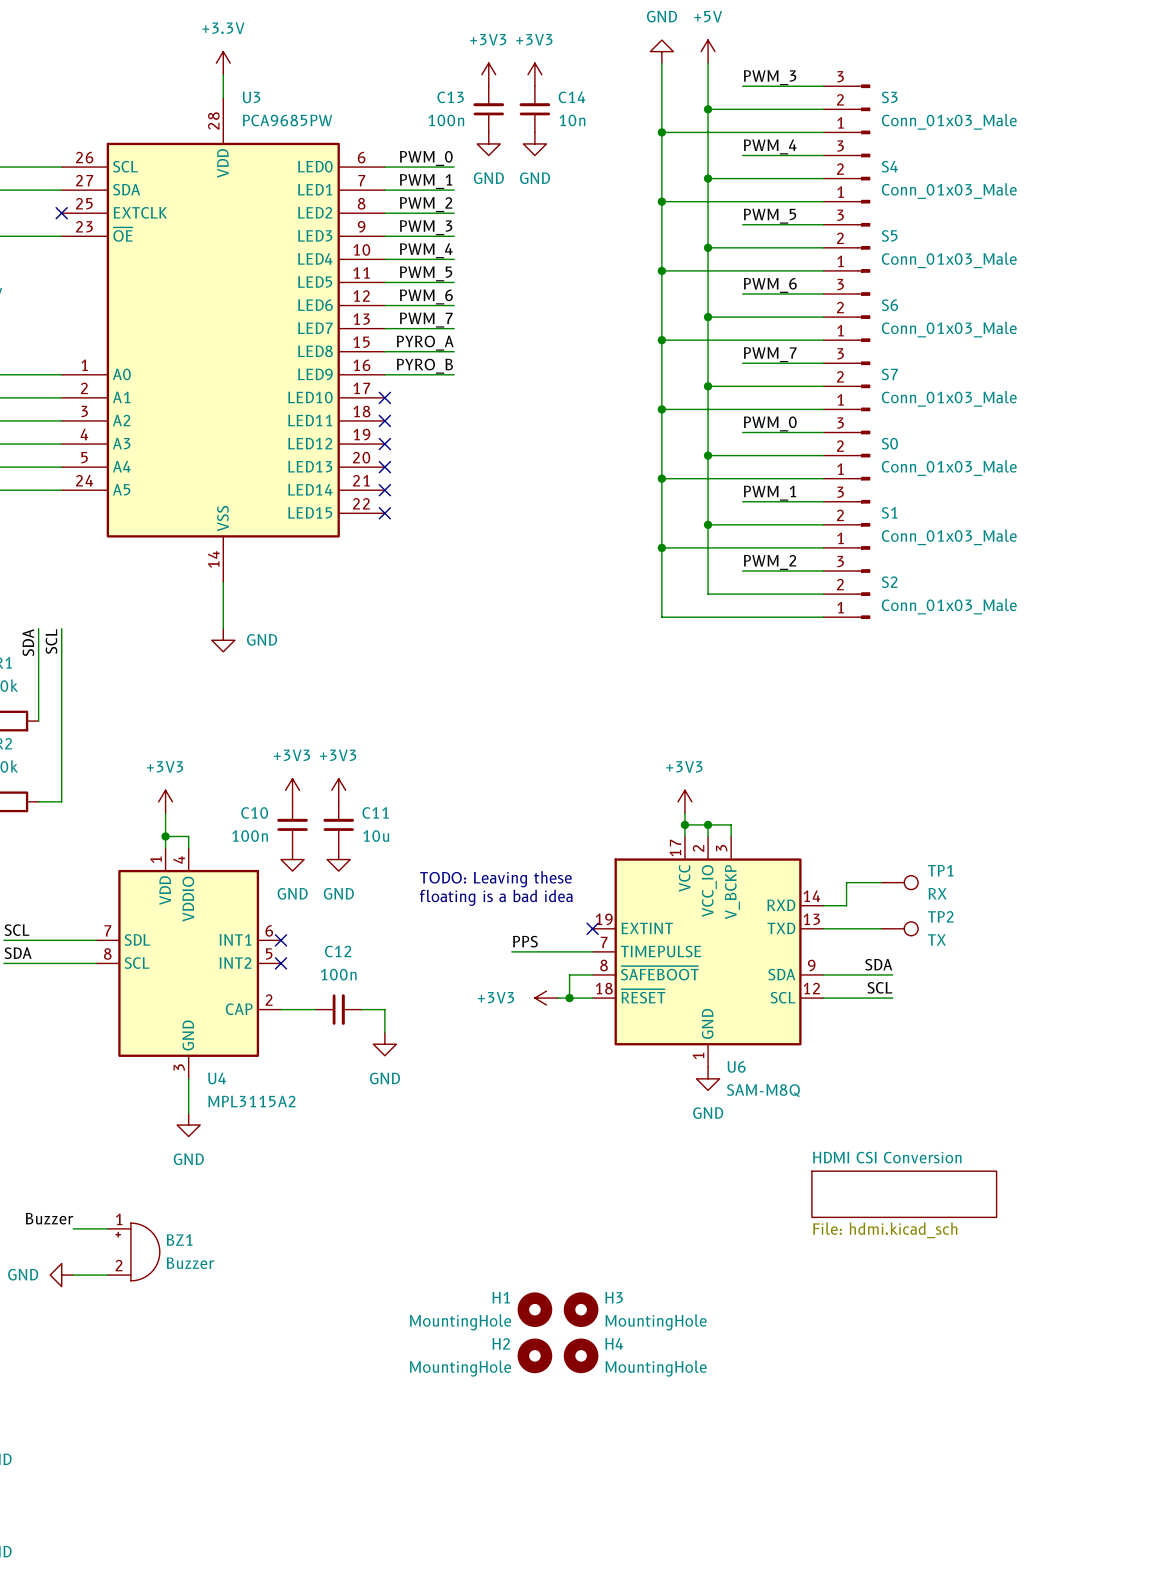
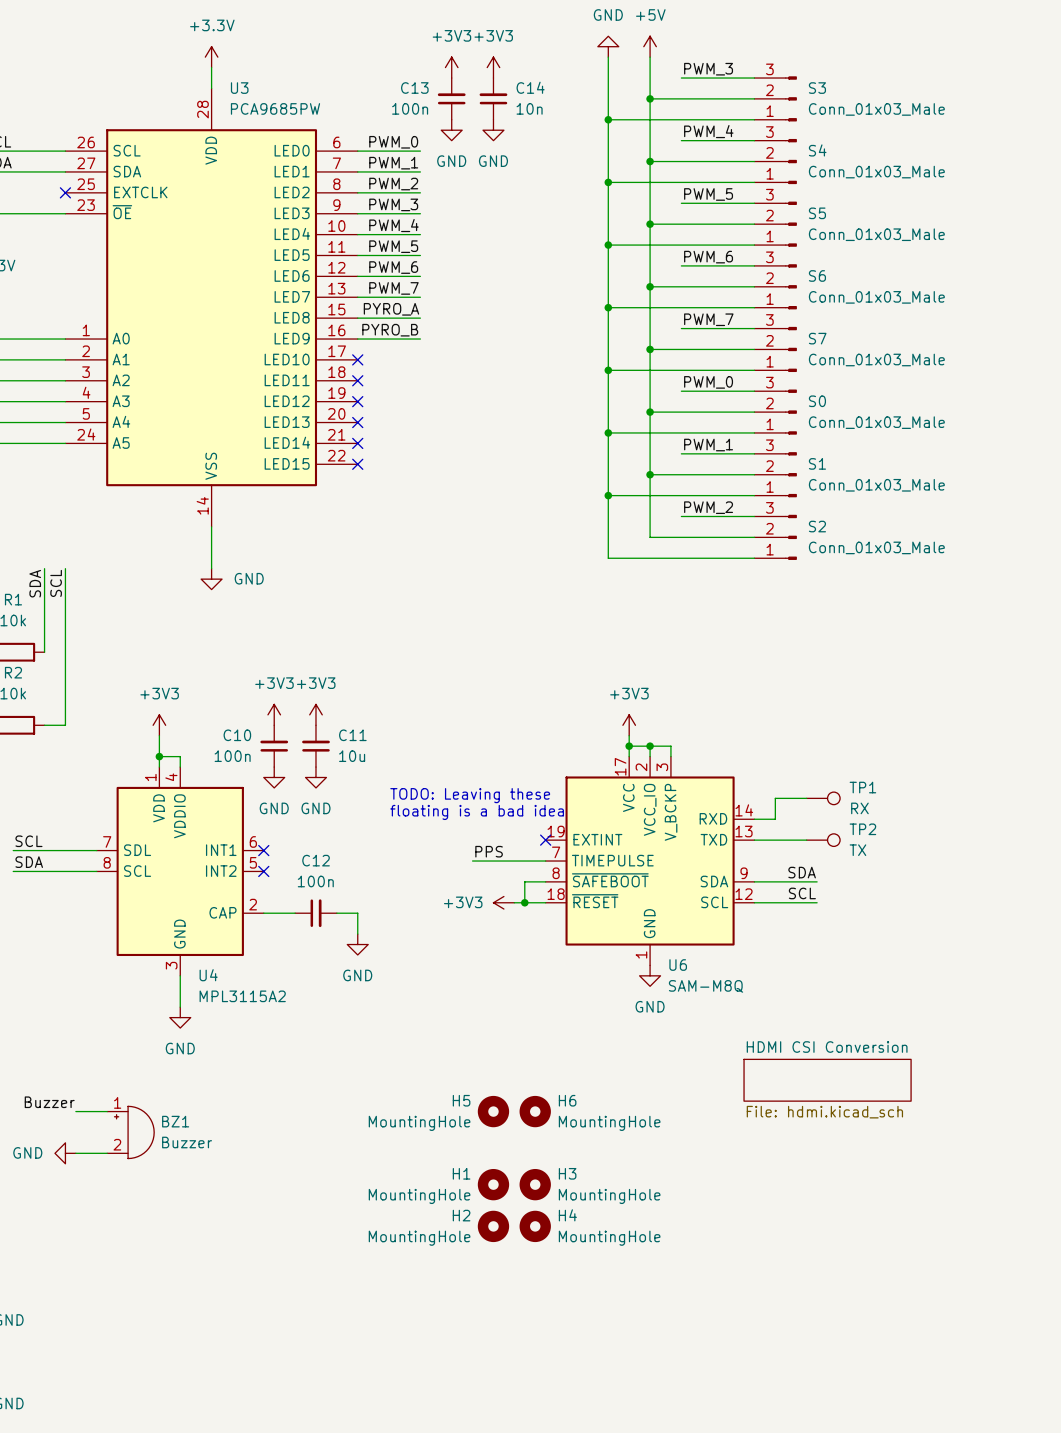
H5: none -> MountingHole (493, 1111)
H6: none -> MountingHole (535, 1111)

